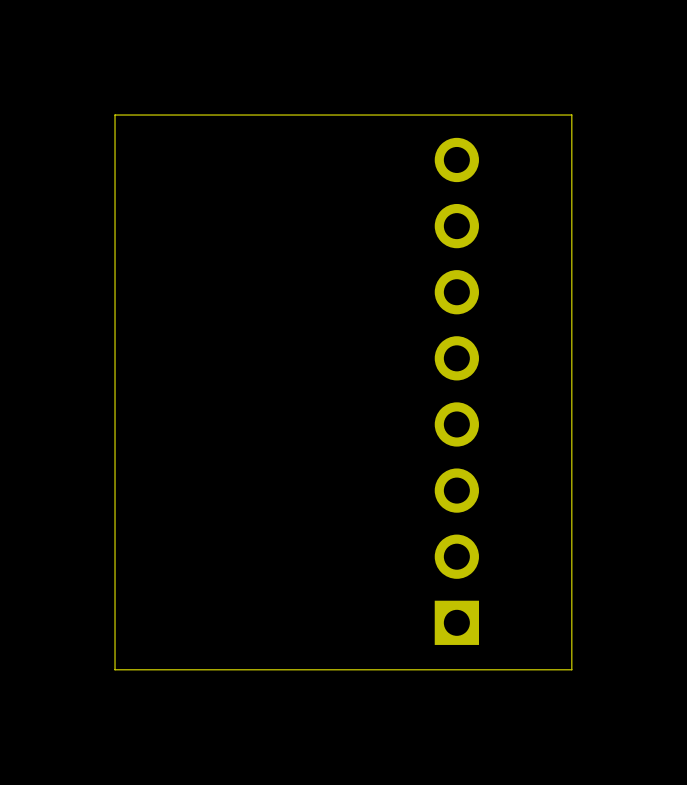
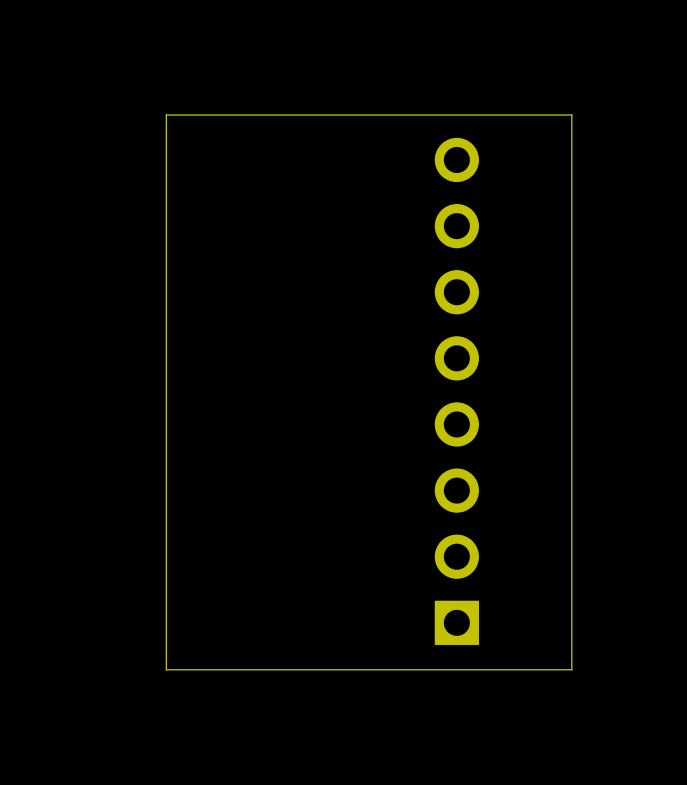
board edge: (166, 115) (115, 115) (115, 669) (166, 669) -> (166, 115) (166, 669)

